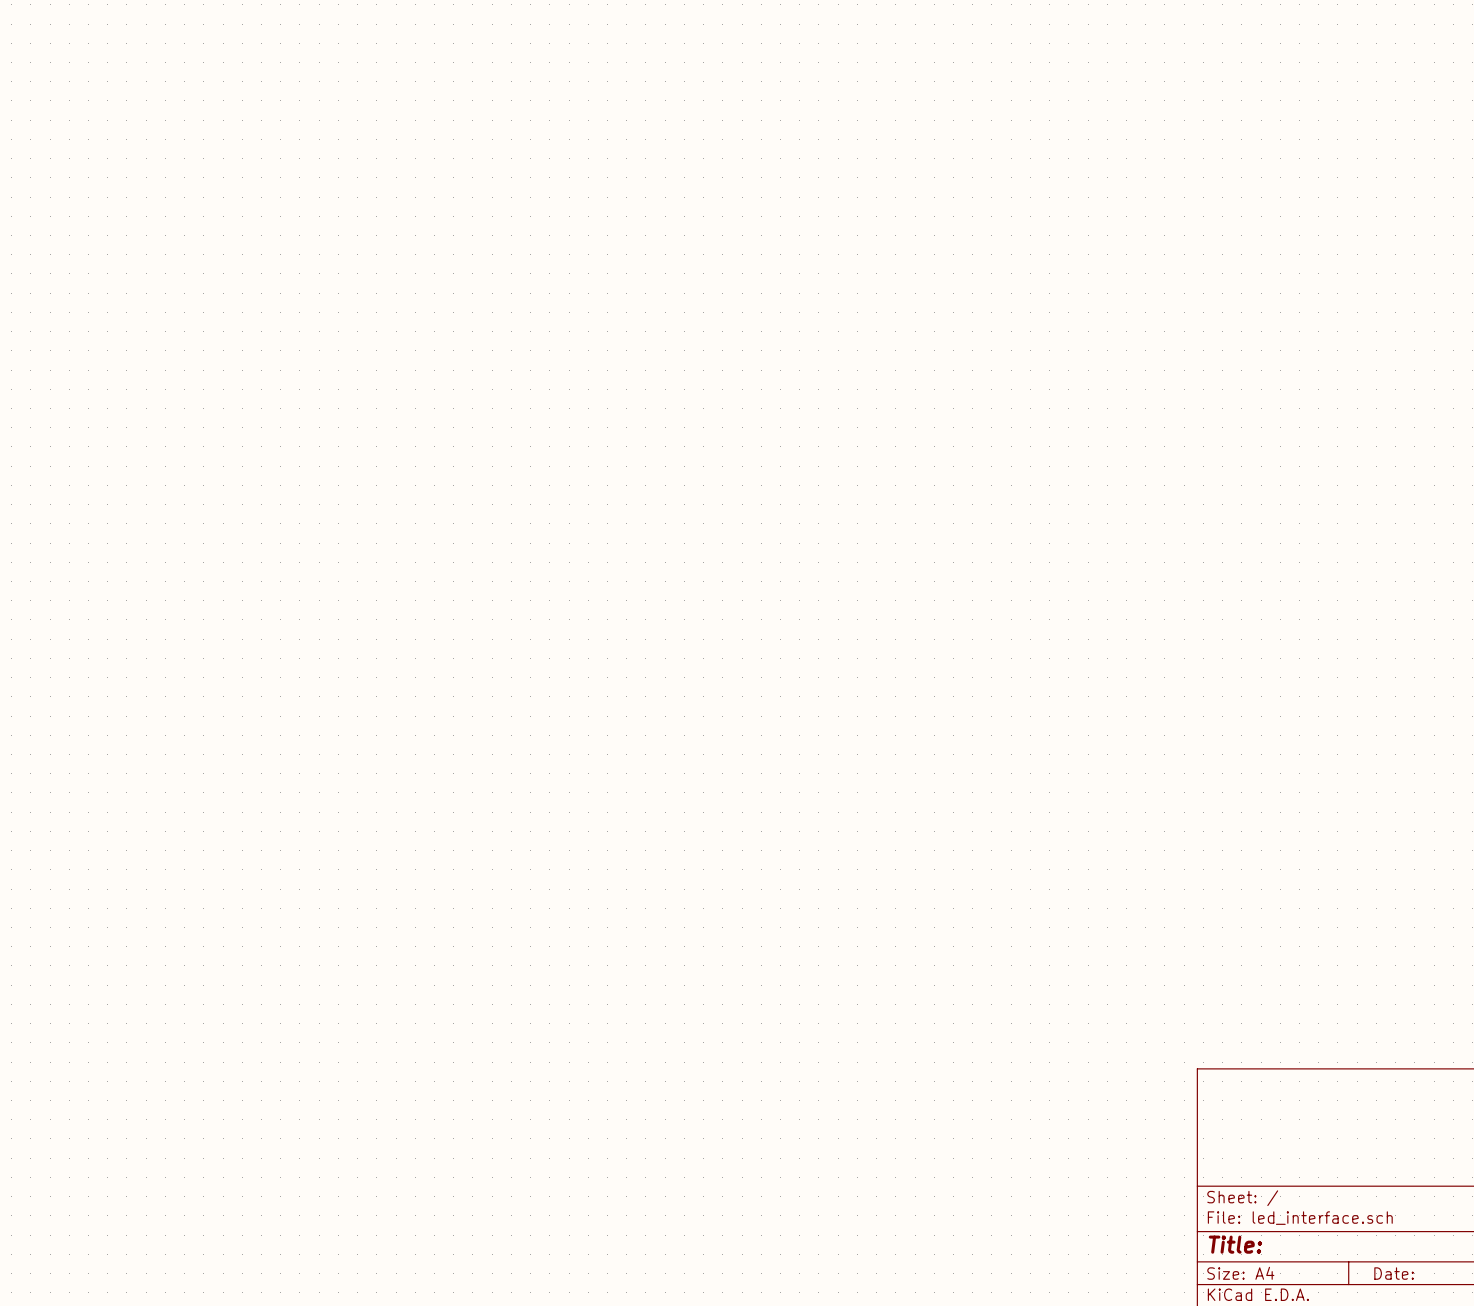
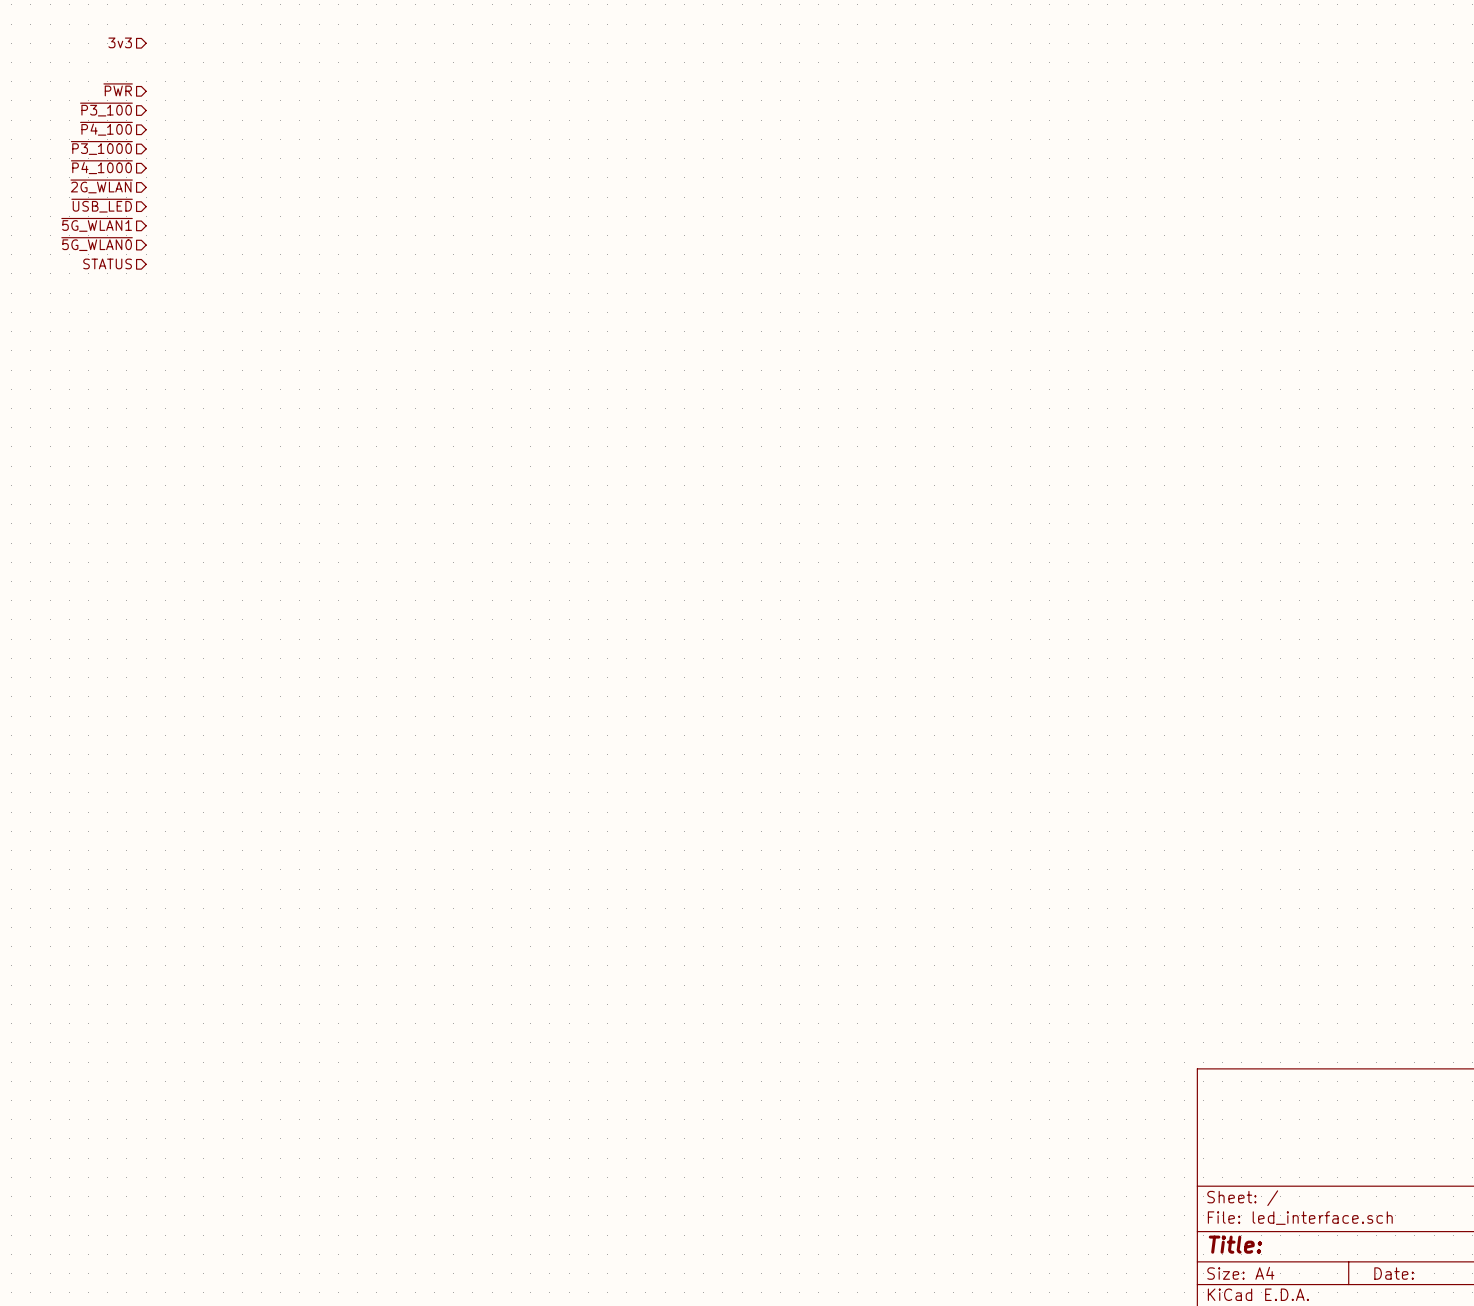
hierarchical label: none -> 3v3 (120, 42)
hierarchical label: none -> ~{PWR} (118, 89)
hierarchical label: none -> ~{P3_100} (106, 109)
hierarchical label: none -> ~{P4_100} (106, 128)
hierarchical label: none -> ~{P3_1000} (101, 147)
hierarchical label: none -> ~{P4_1000} (101, 167)
hierarchical label: none -> ~{2G_WLAN} (101, 186)
hierarchical label: none -> ~{USB_LED} (102, 205)
hierarchical label: none -> ~{5G_WLAN1} (97, 224)
hierarchical label: none -> ~{5G_WLAN0} (97, 244)
hierarchical label: none -> STATUS (107, 263)

